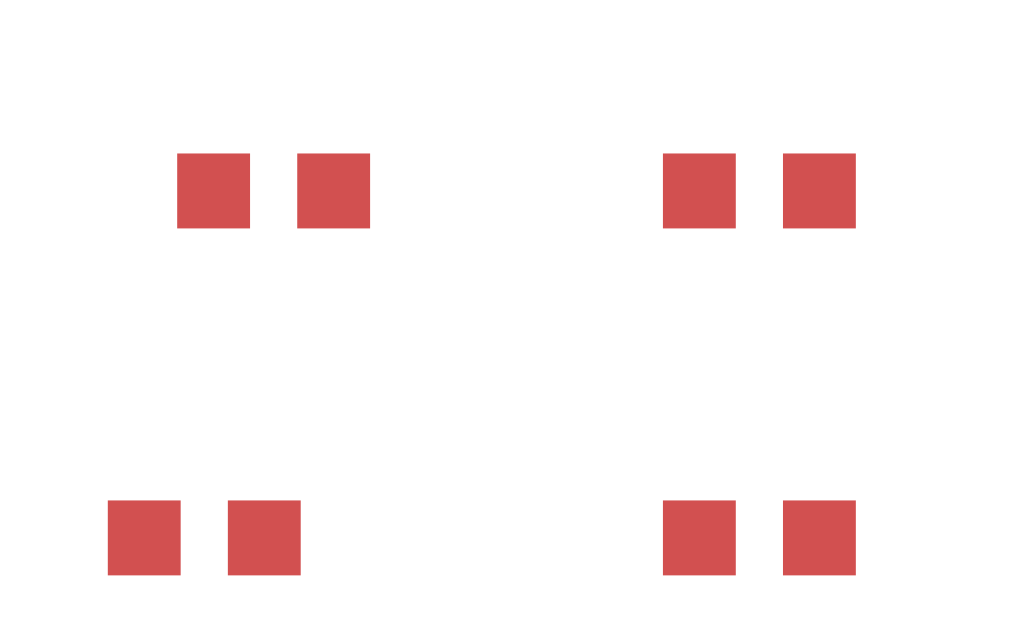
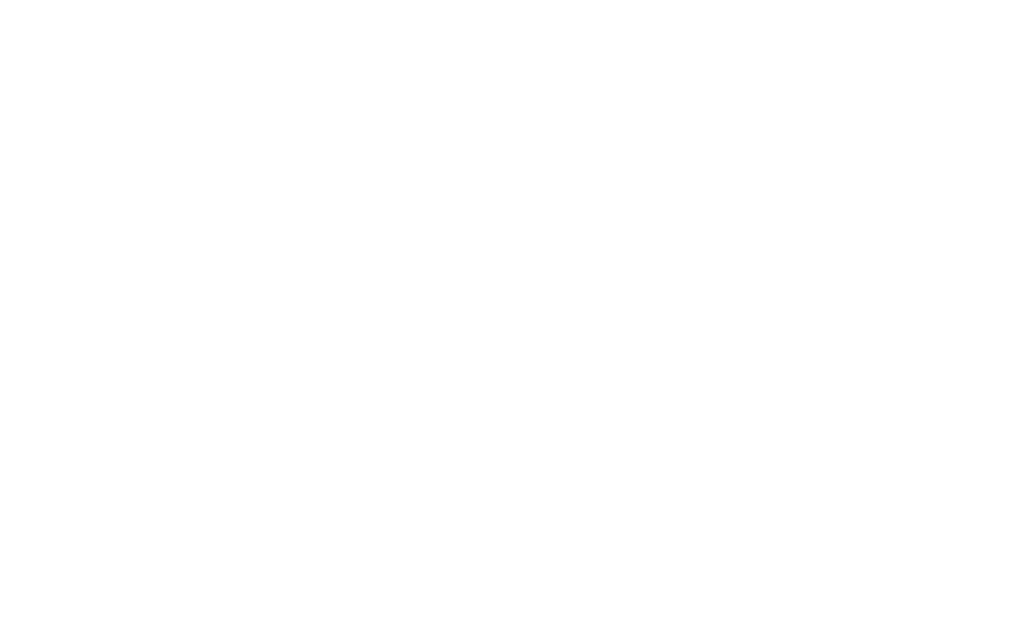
part: (273, 190) -> none
part: (759, 190) -> none
part: (204, 537) -> none
part: (759, 537) -> none

